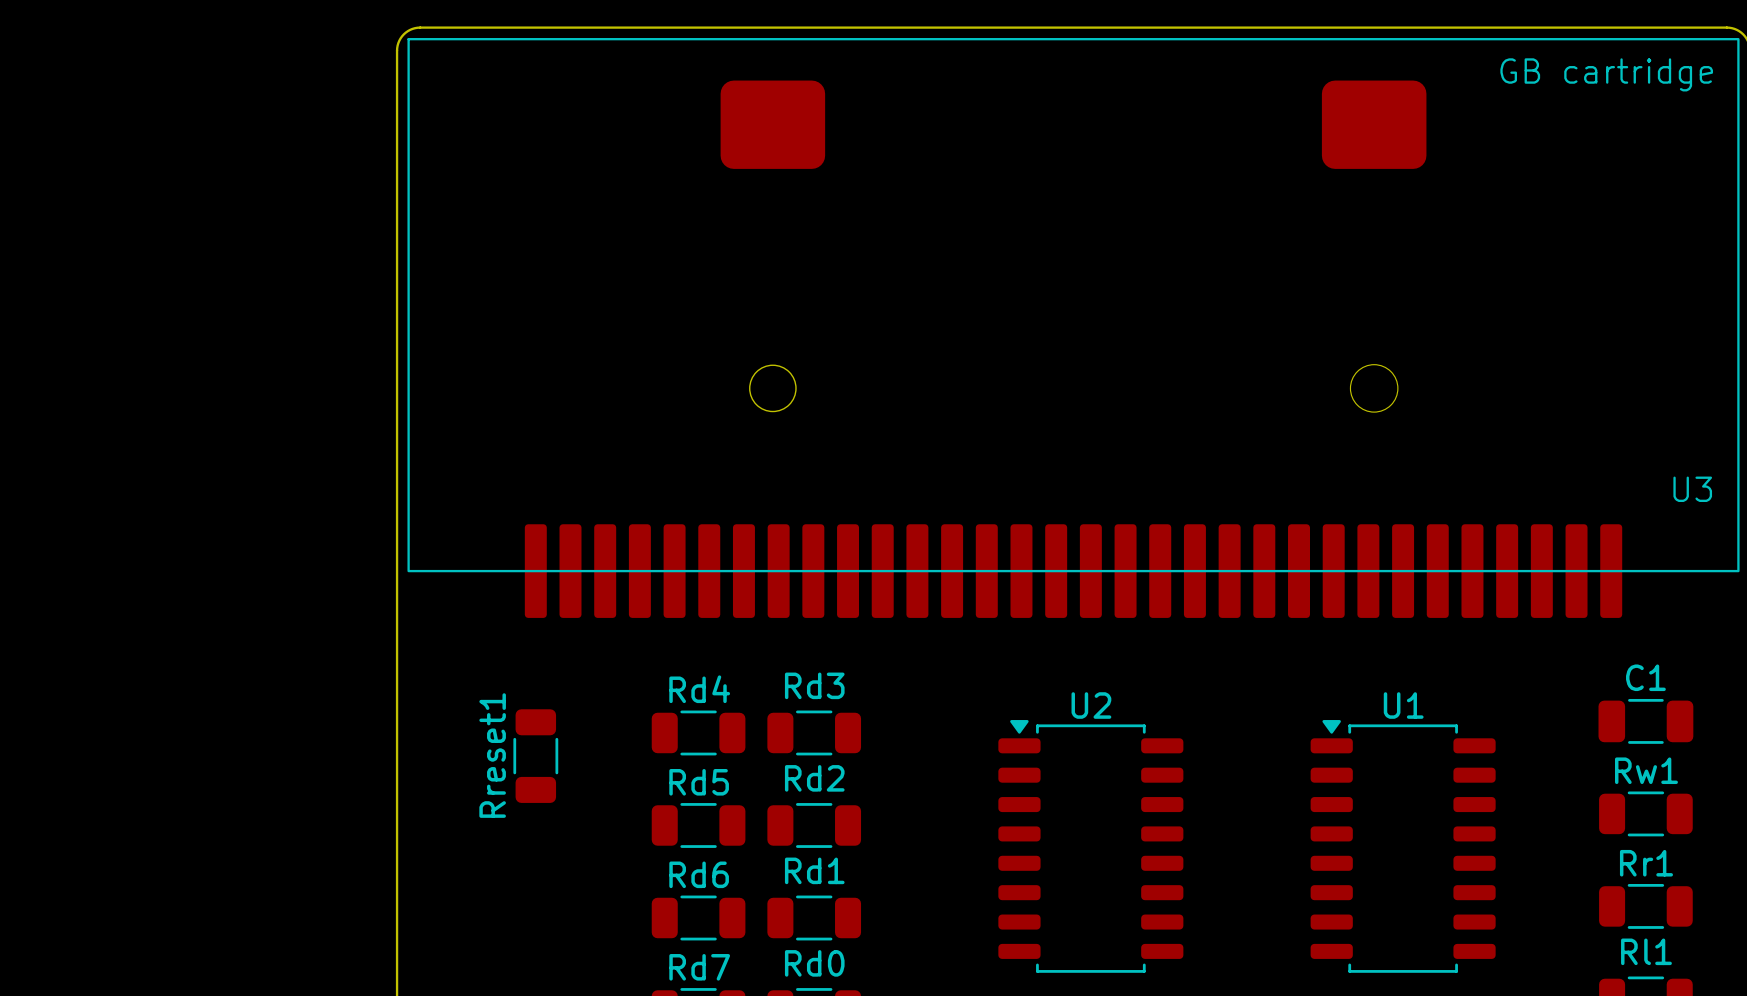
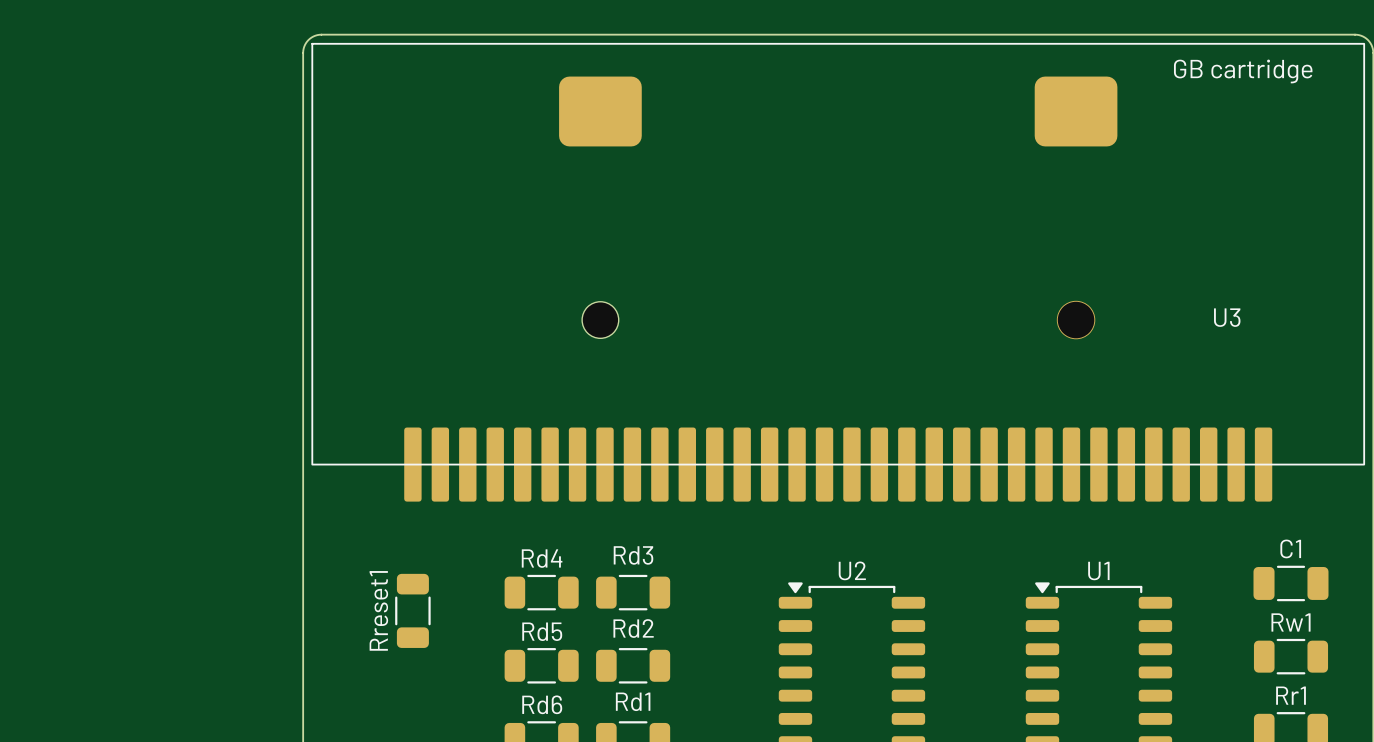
U3 name position: U3 (1692, 489) -> U3 (1227, 317)

